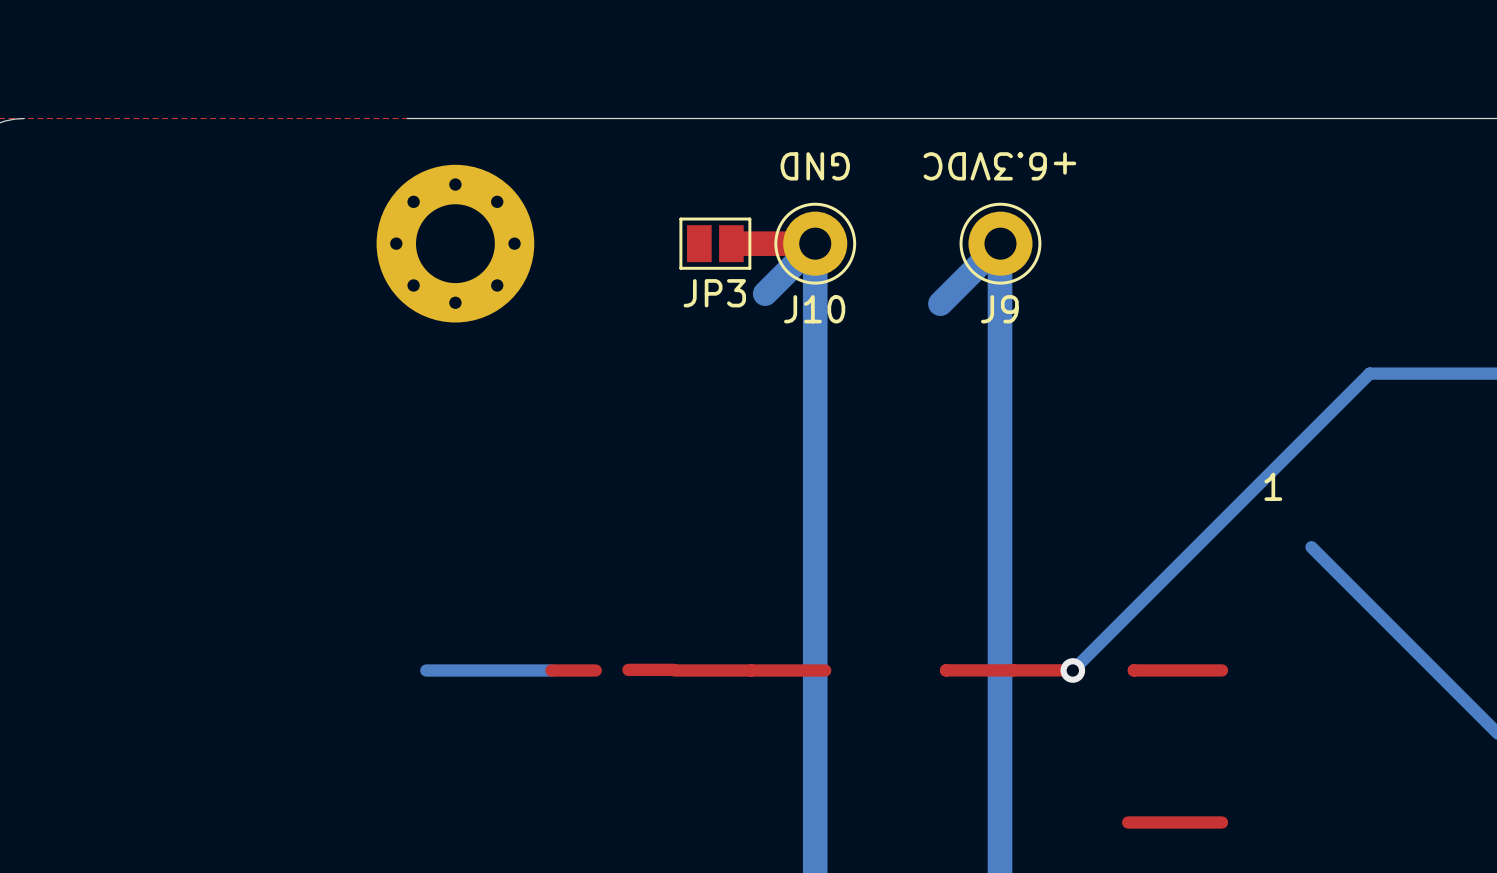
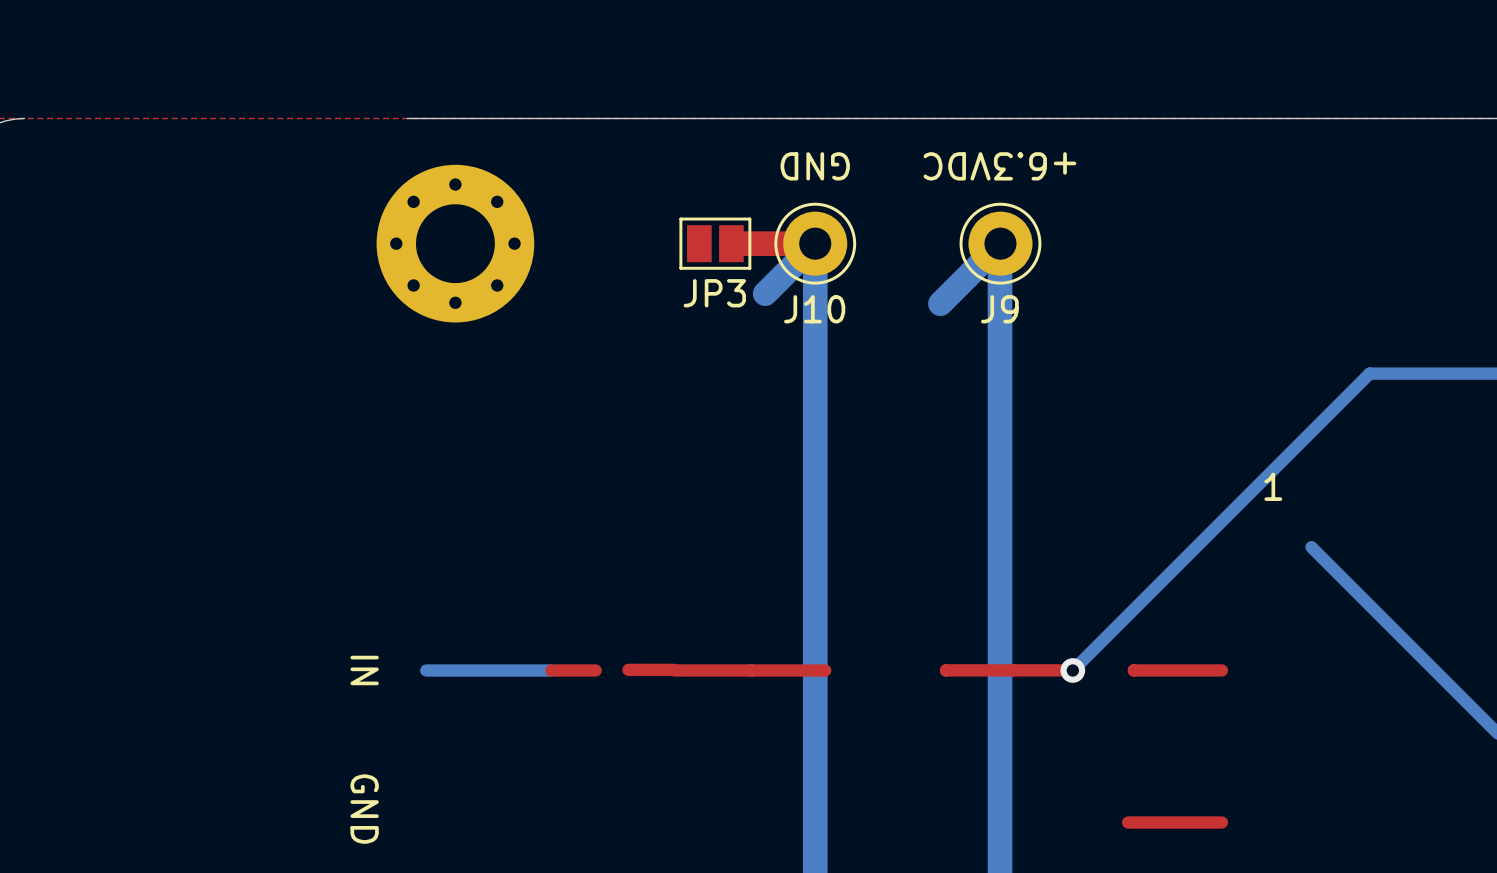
text: none -> IN (364, 670)
text: none -> GND (364, 809)

